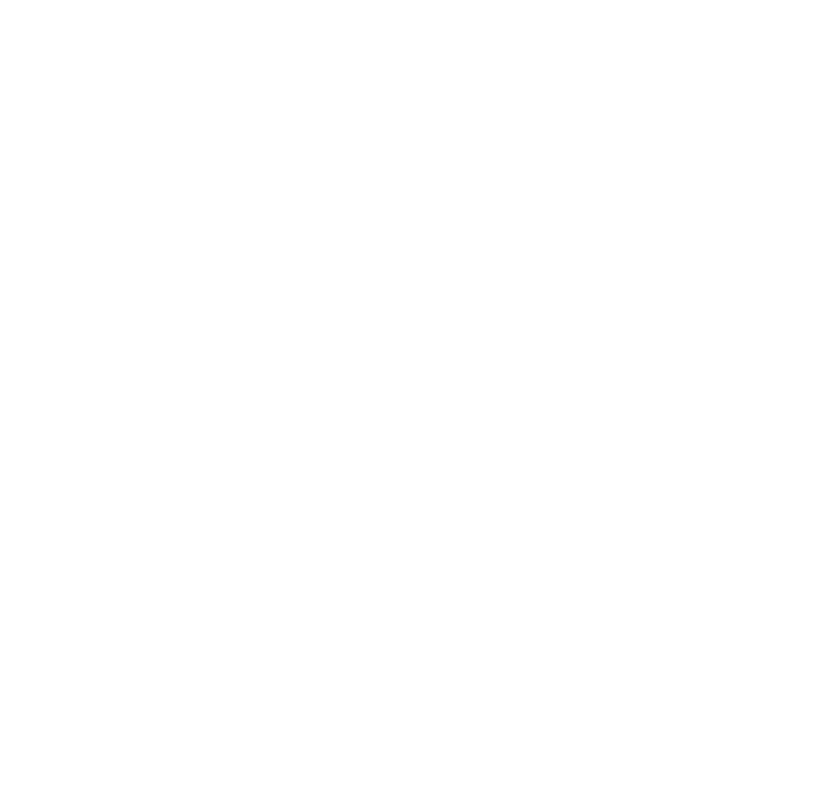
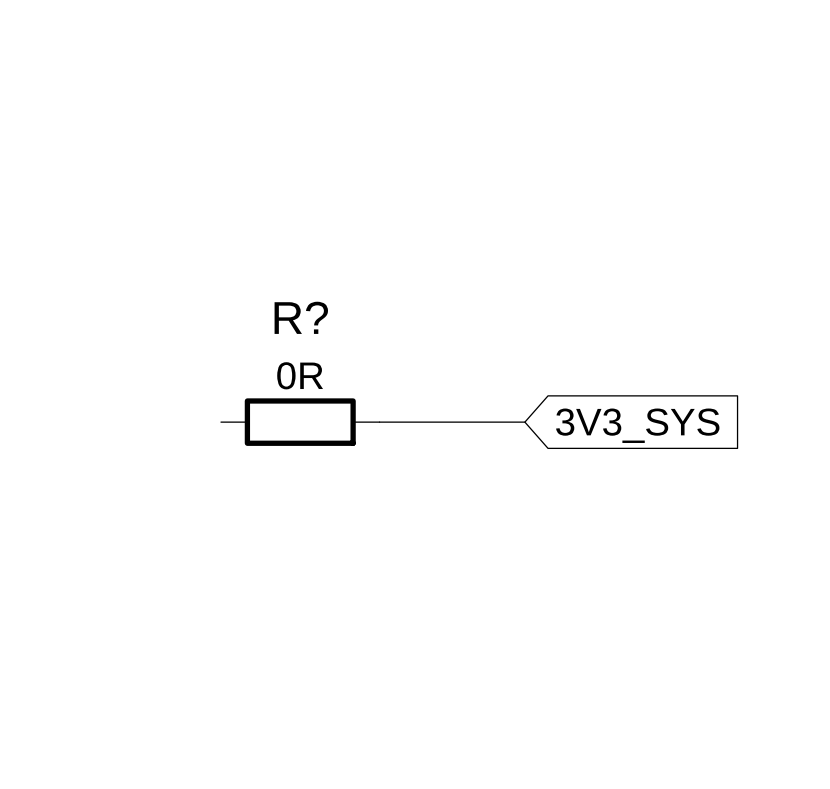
R?: none -> (300, 422)
wire: none -> (379, 422) (524, 422)
global label: none -> 3V3_SYS (637, 425)

